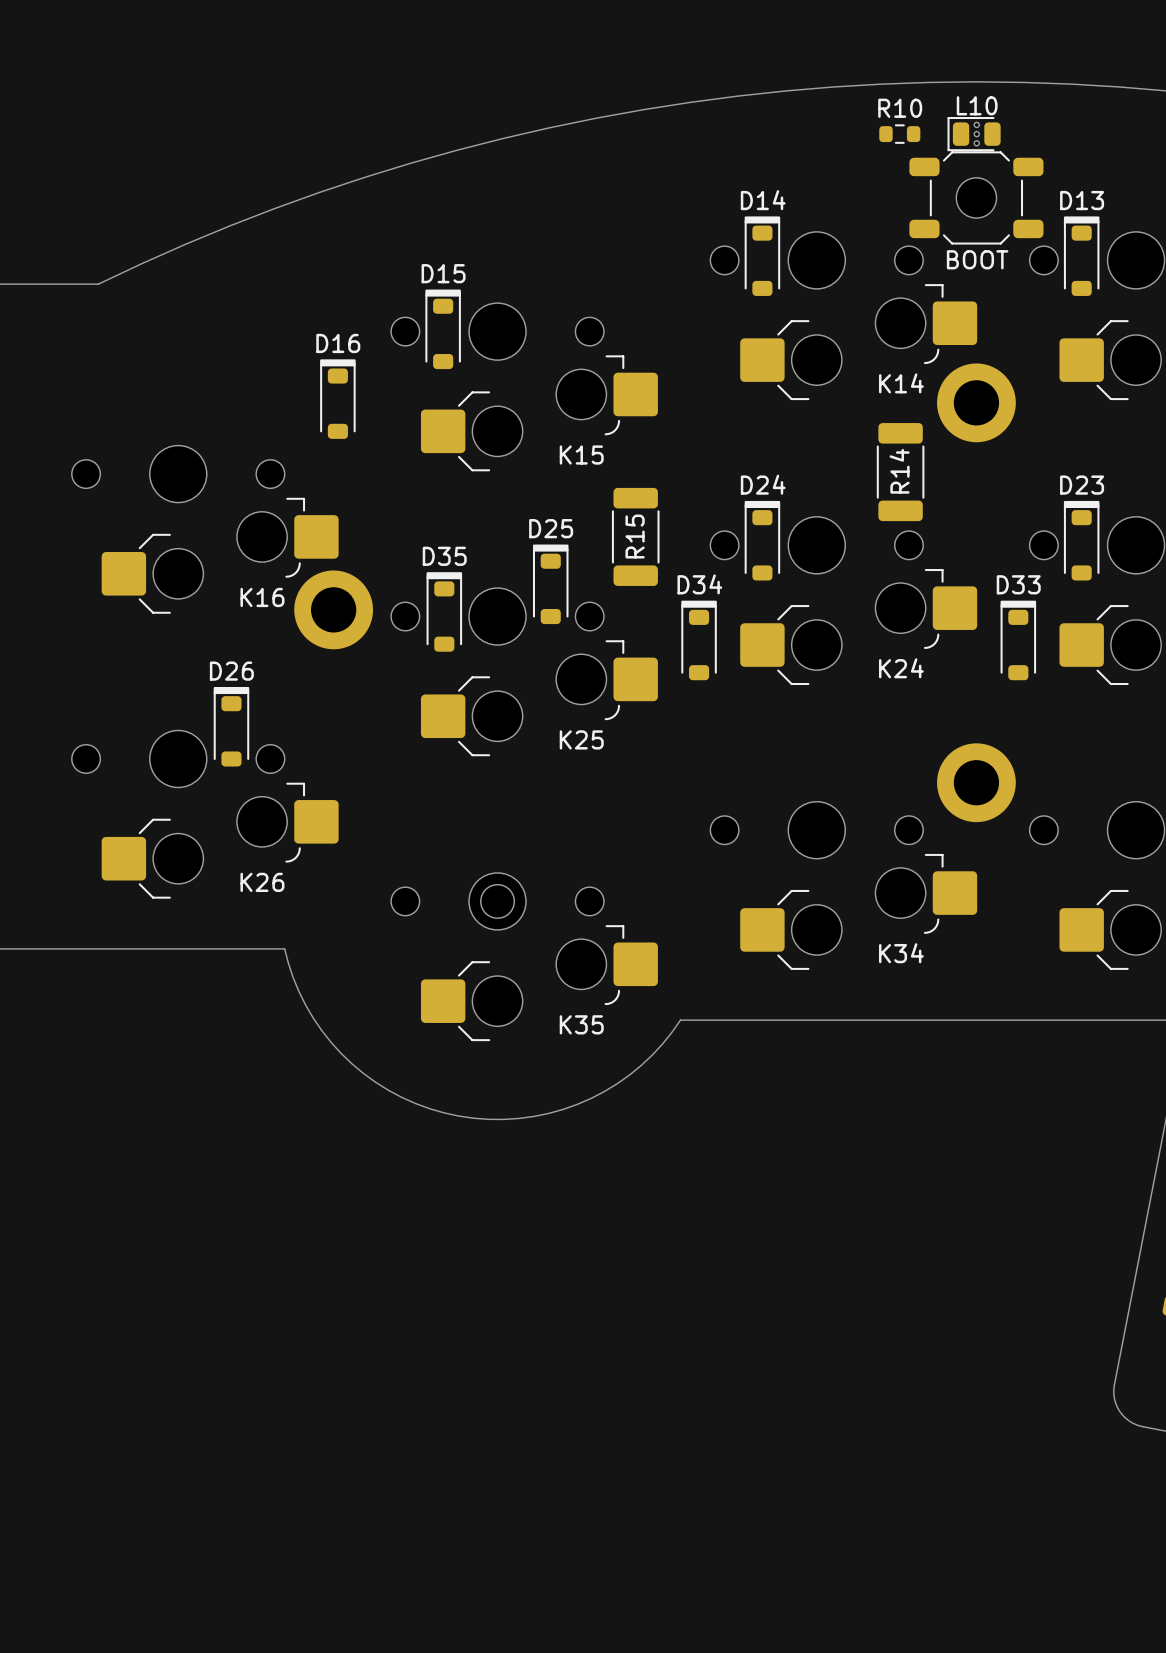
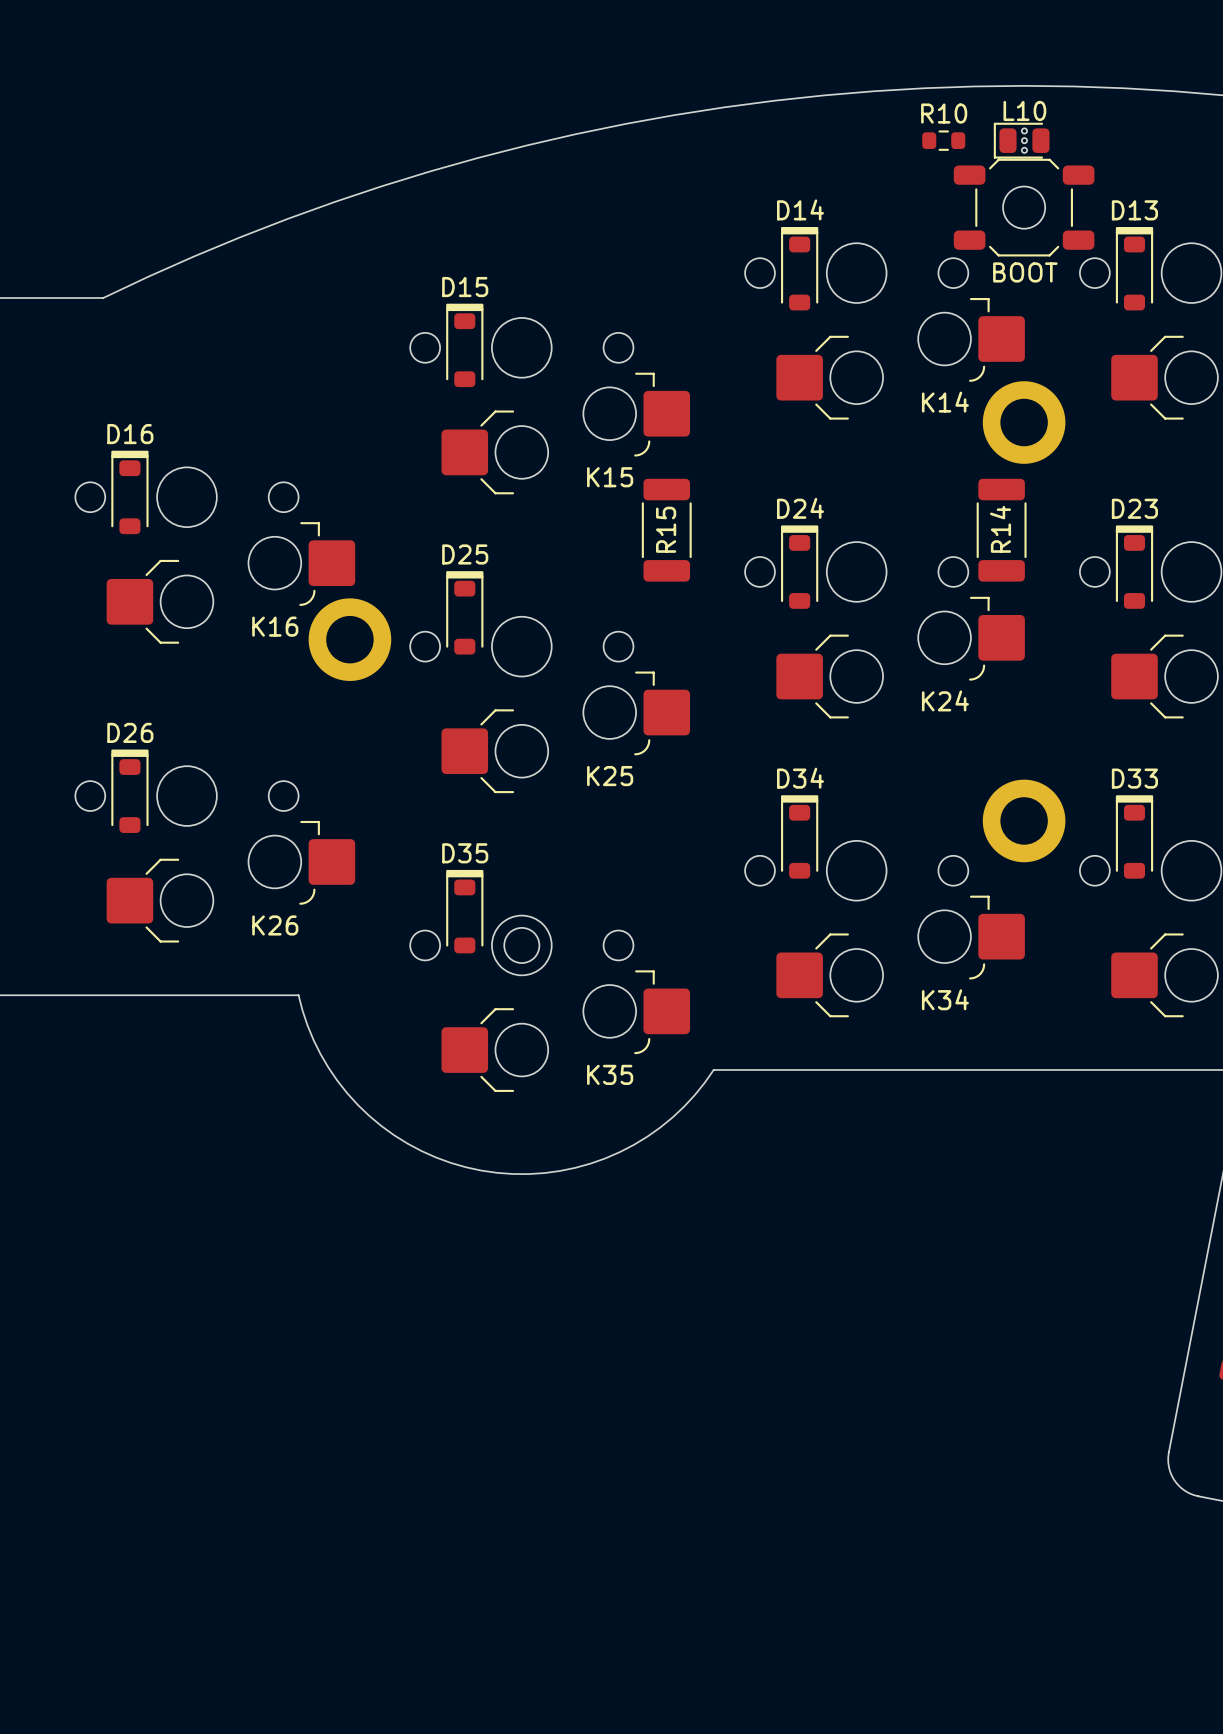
D16 position: (337, 399) -> (129, 492)
R14 position: (900, 472) -> (1001, 530)
R15 position: (635, 536) -> (666, 530)
D25 position: (550, 584) -> (464, 612)
D35 position: (444, 611) -> (464, 911)
D34 position: (699, 640) -> (799, 836)
D33 position: (1018, 640) -> (1134, 836)
D26 position: (231, 726) -> (129, 791)

